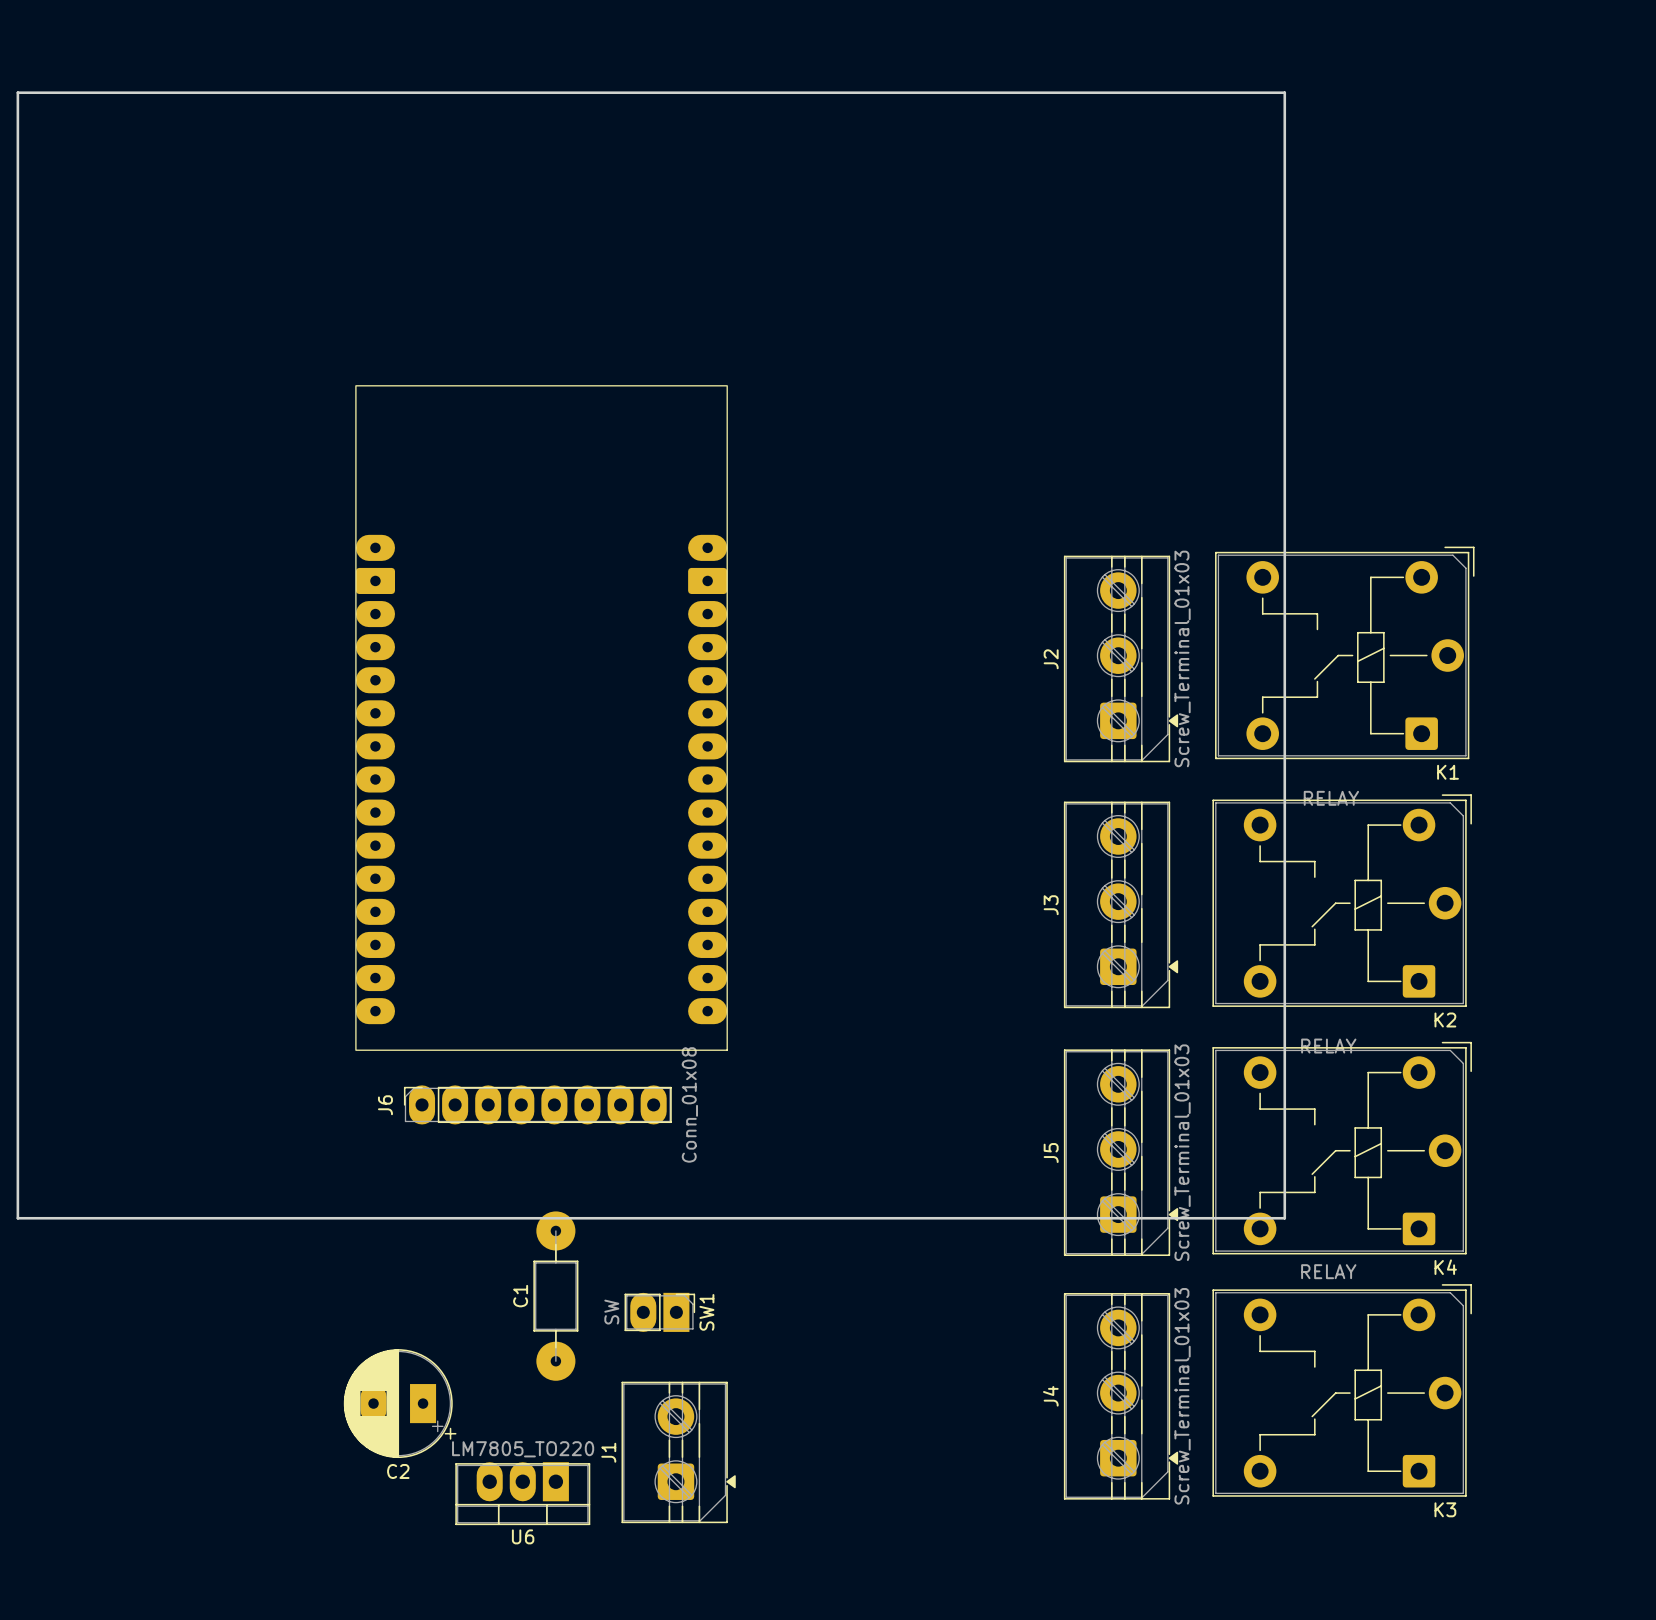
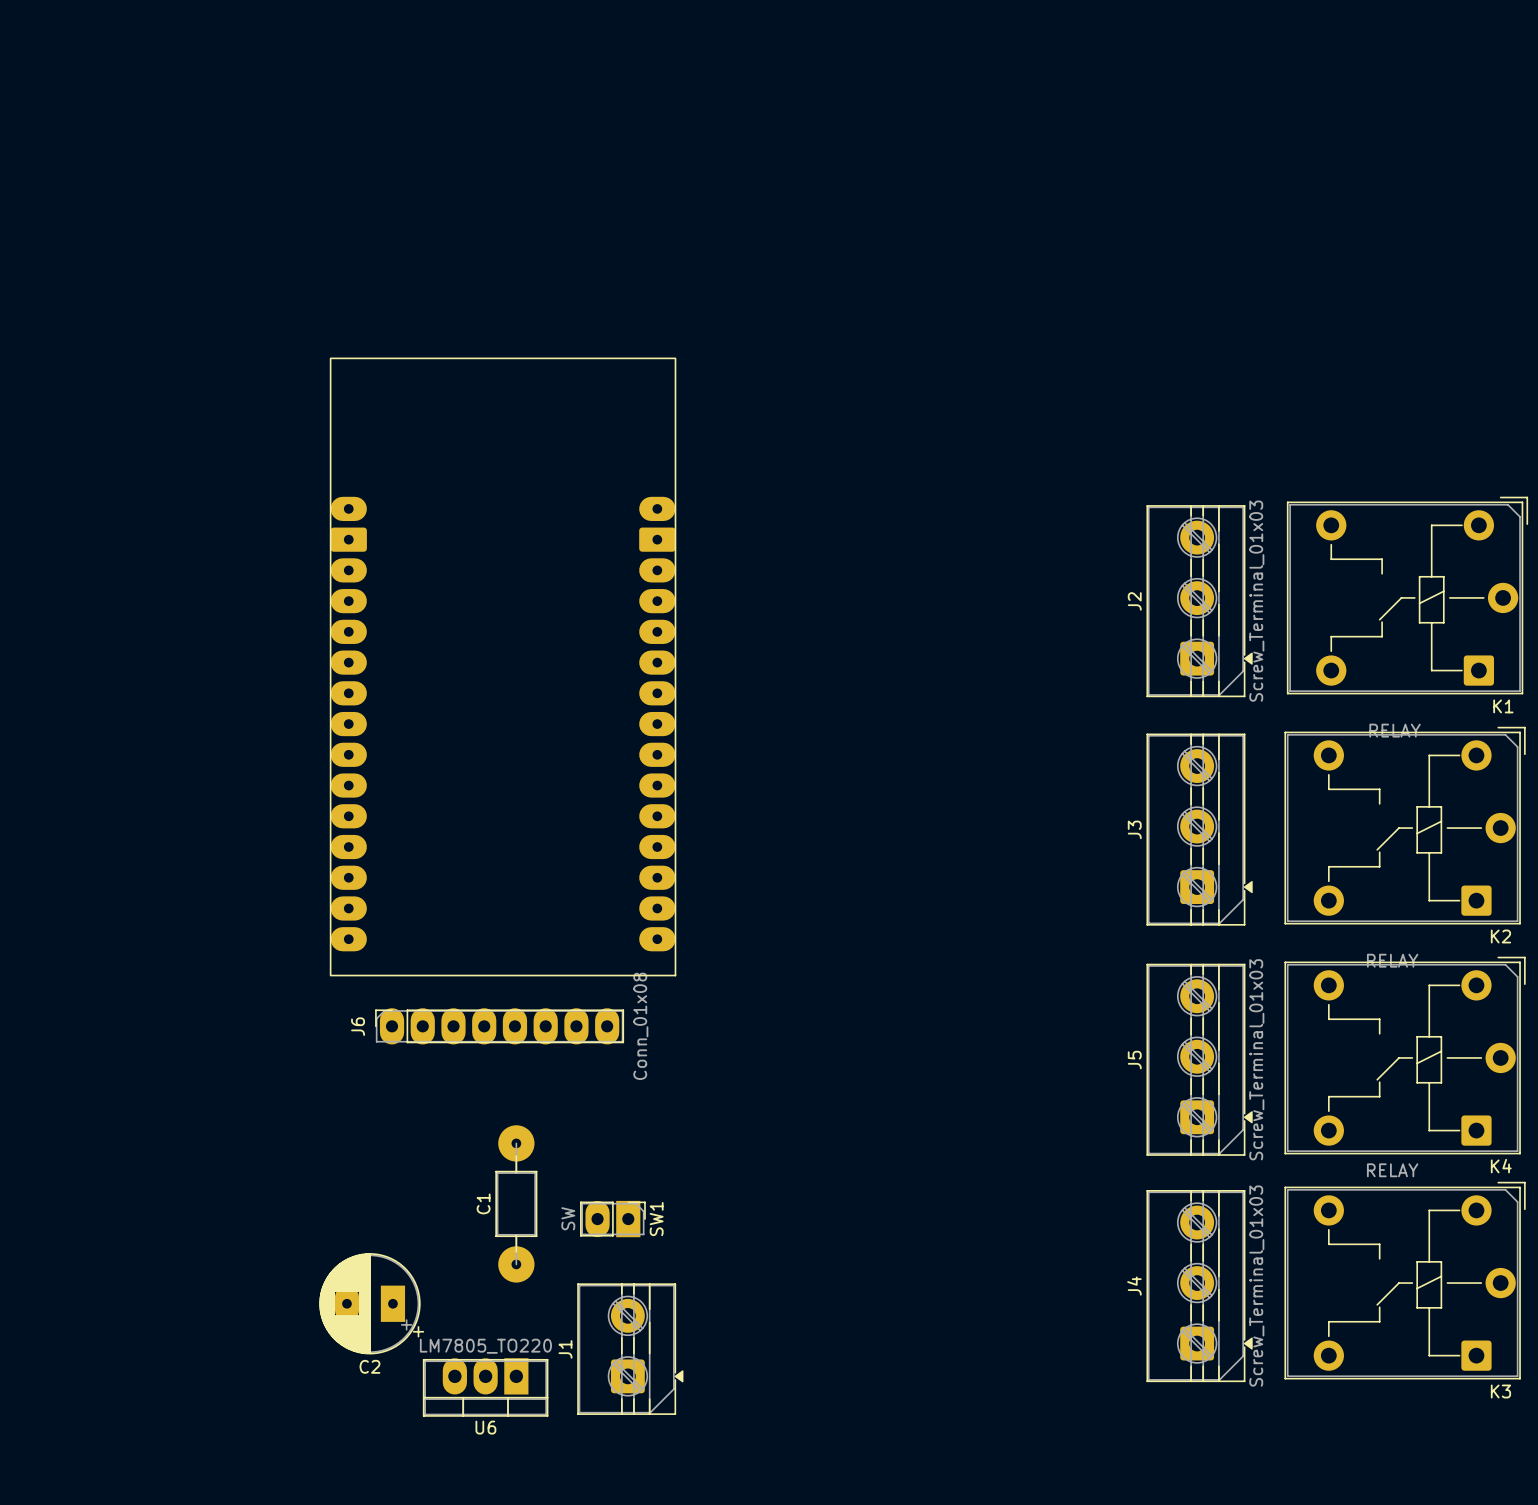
board edge: (17, 92) (1284, 92) (1284, 1218) (17, 1218) (17, 92) -> none
K1 position: (1344, 652) -> (1407, 595)
J2 position: (1121, 658) -> (1199, 601)
K2 position: (1342, 900) -> (1405, 825)
J3 position: (1121, 904) -> (1199, 829)
K4 position: (1342, 1148) -> (1405, 1055)
J5 position: (1121, 1152) -> (1199, 1059)
K3 position: (1342, 1390) -> (1405, 1280)
J4 position: (1121, 1396) -> (1199, 1286)

